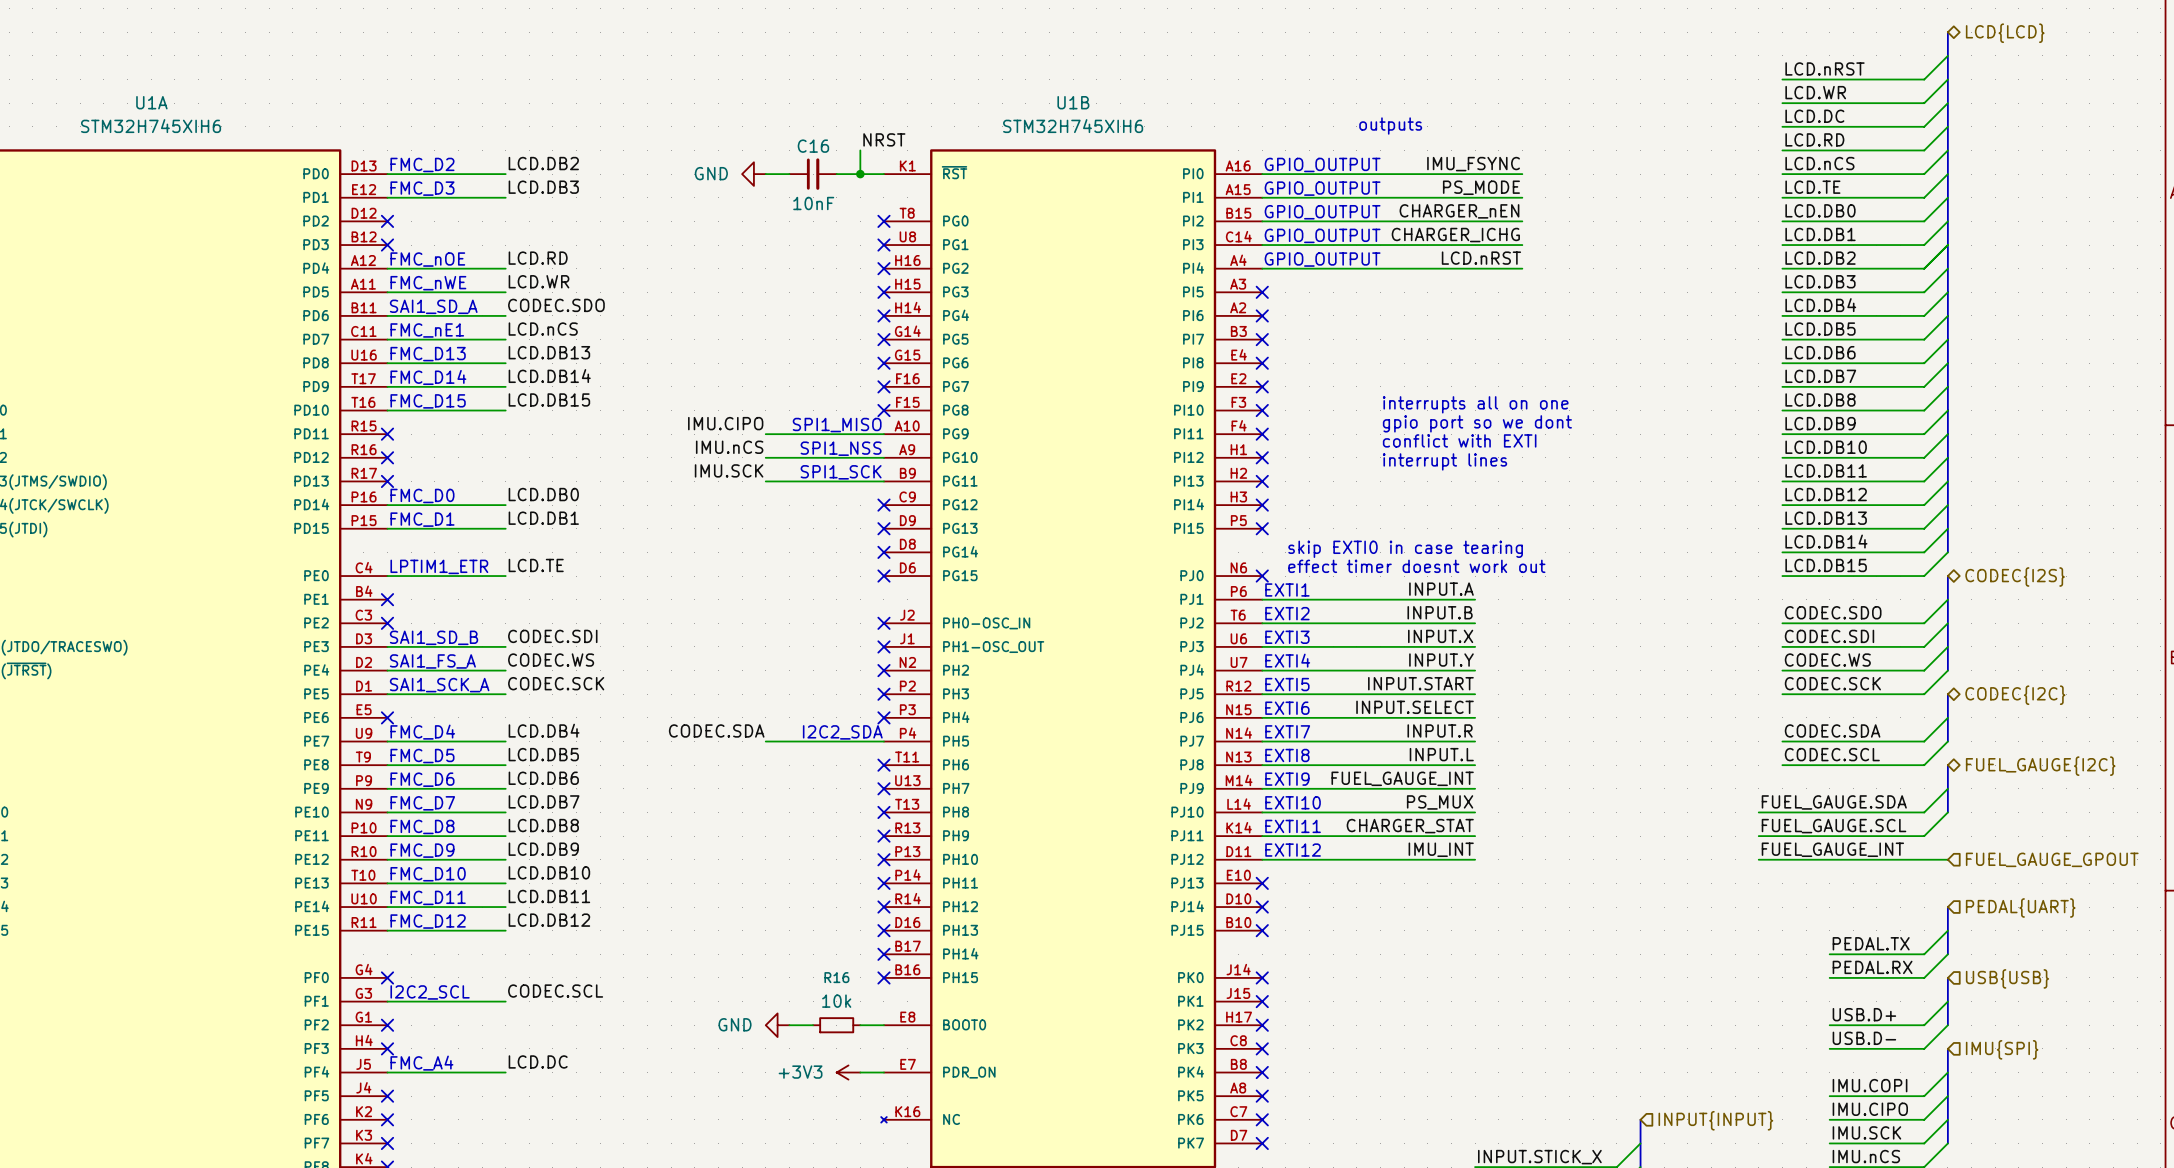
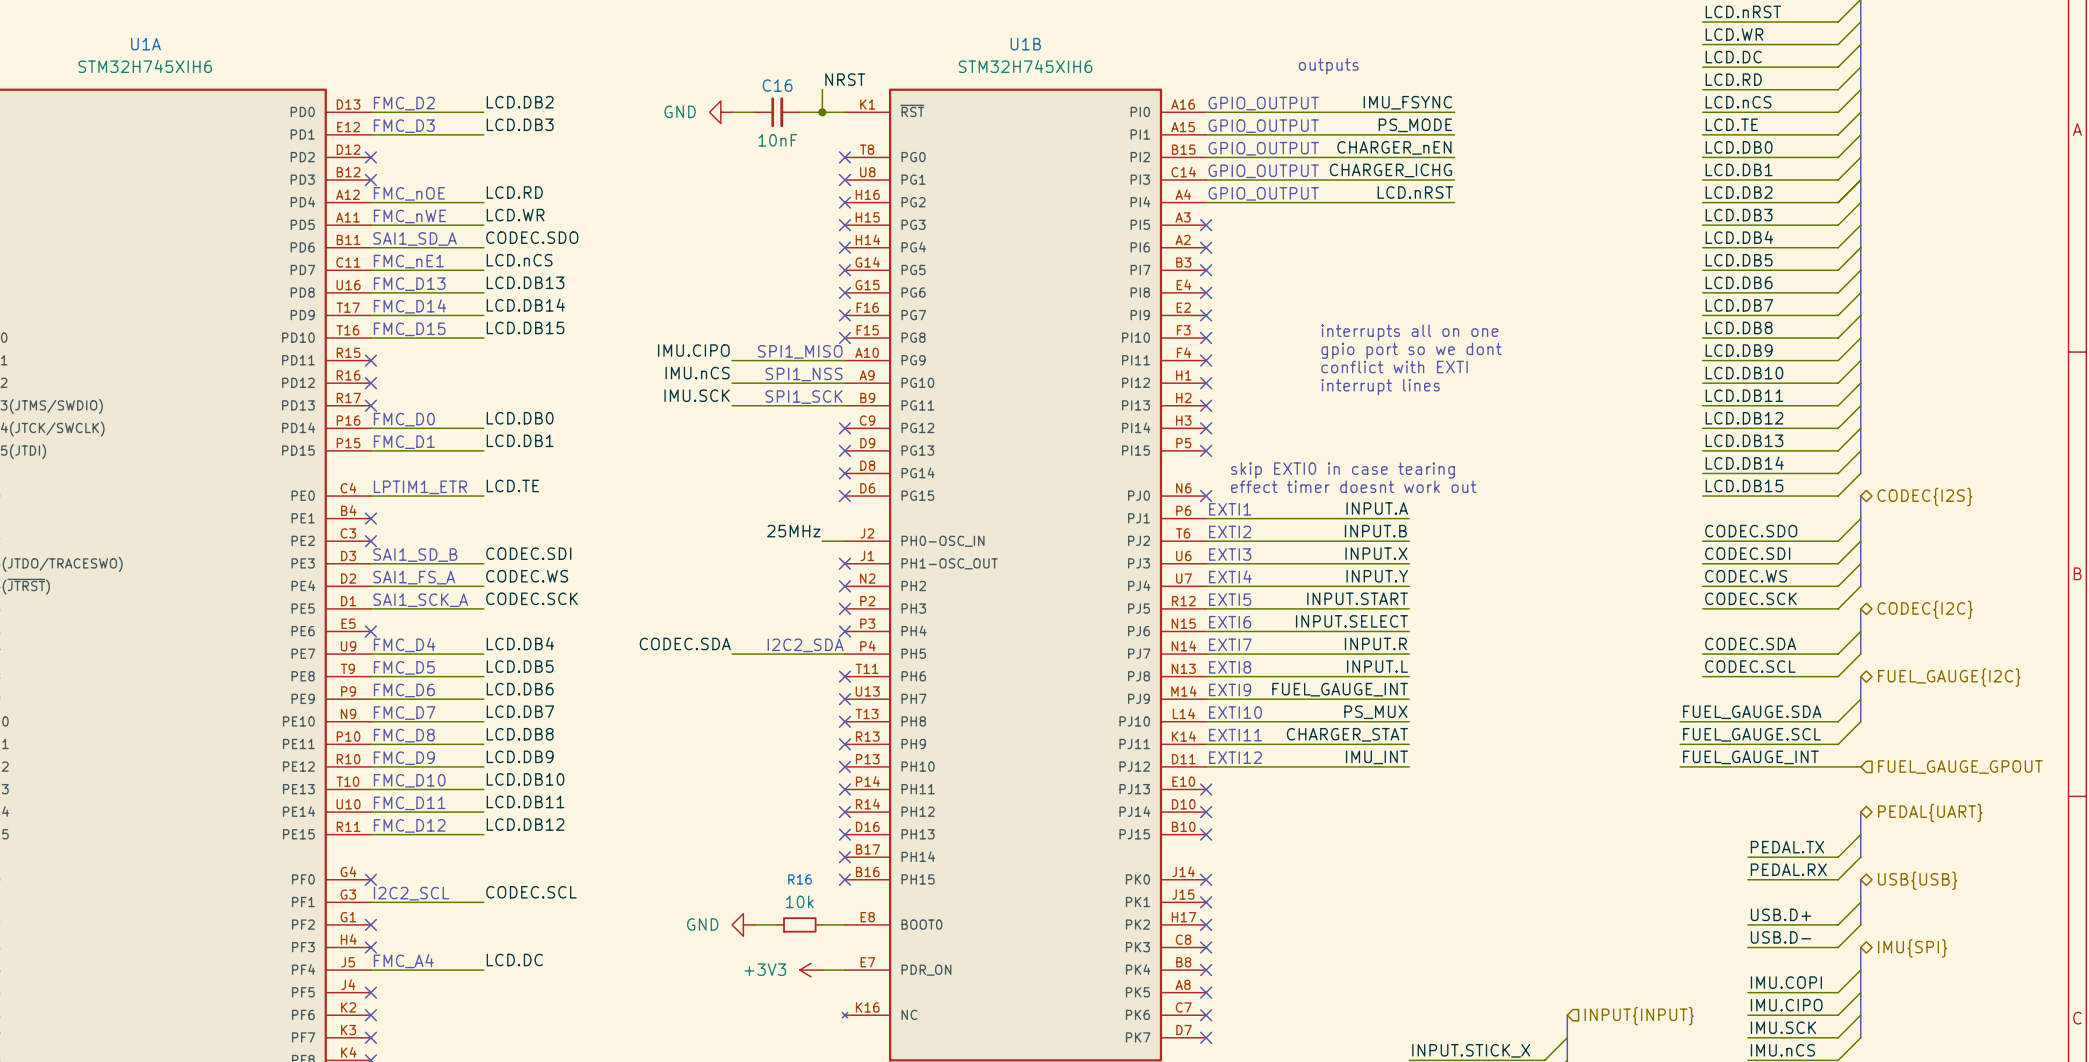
label: none -> 25MHz (793, 531)
wire: none -> (822, 541) (844, 541)
no-connect mark: (883, 623) -> none
hierarchical label shape: input (2020, 907) -> bidirectional (1930, 812)
hierarchical label shape: input (2007, 978) -> bidirectional (1917, 880)
hierarchical label shape: input (2002, 1049) -> bidirectional (1912, 948)

